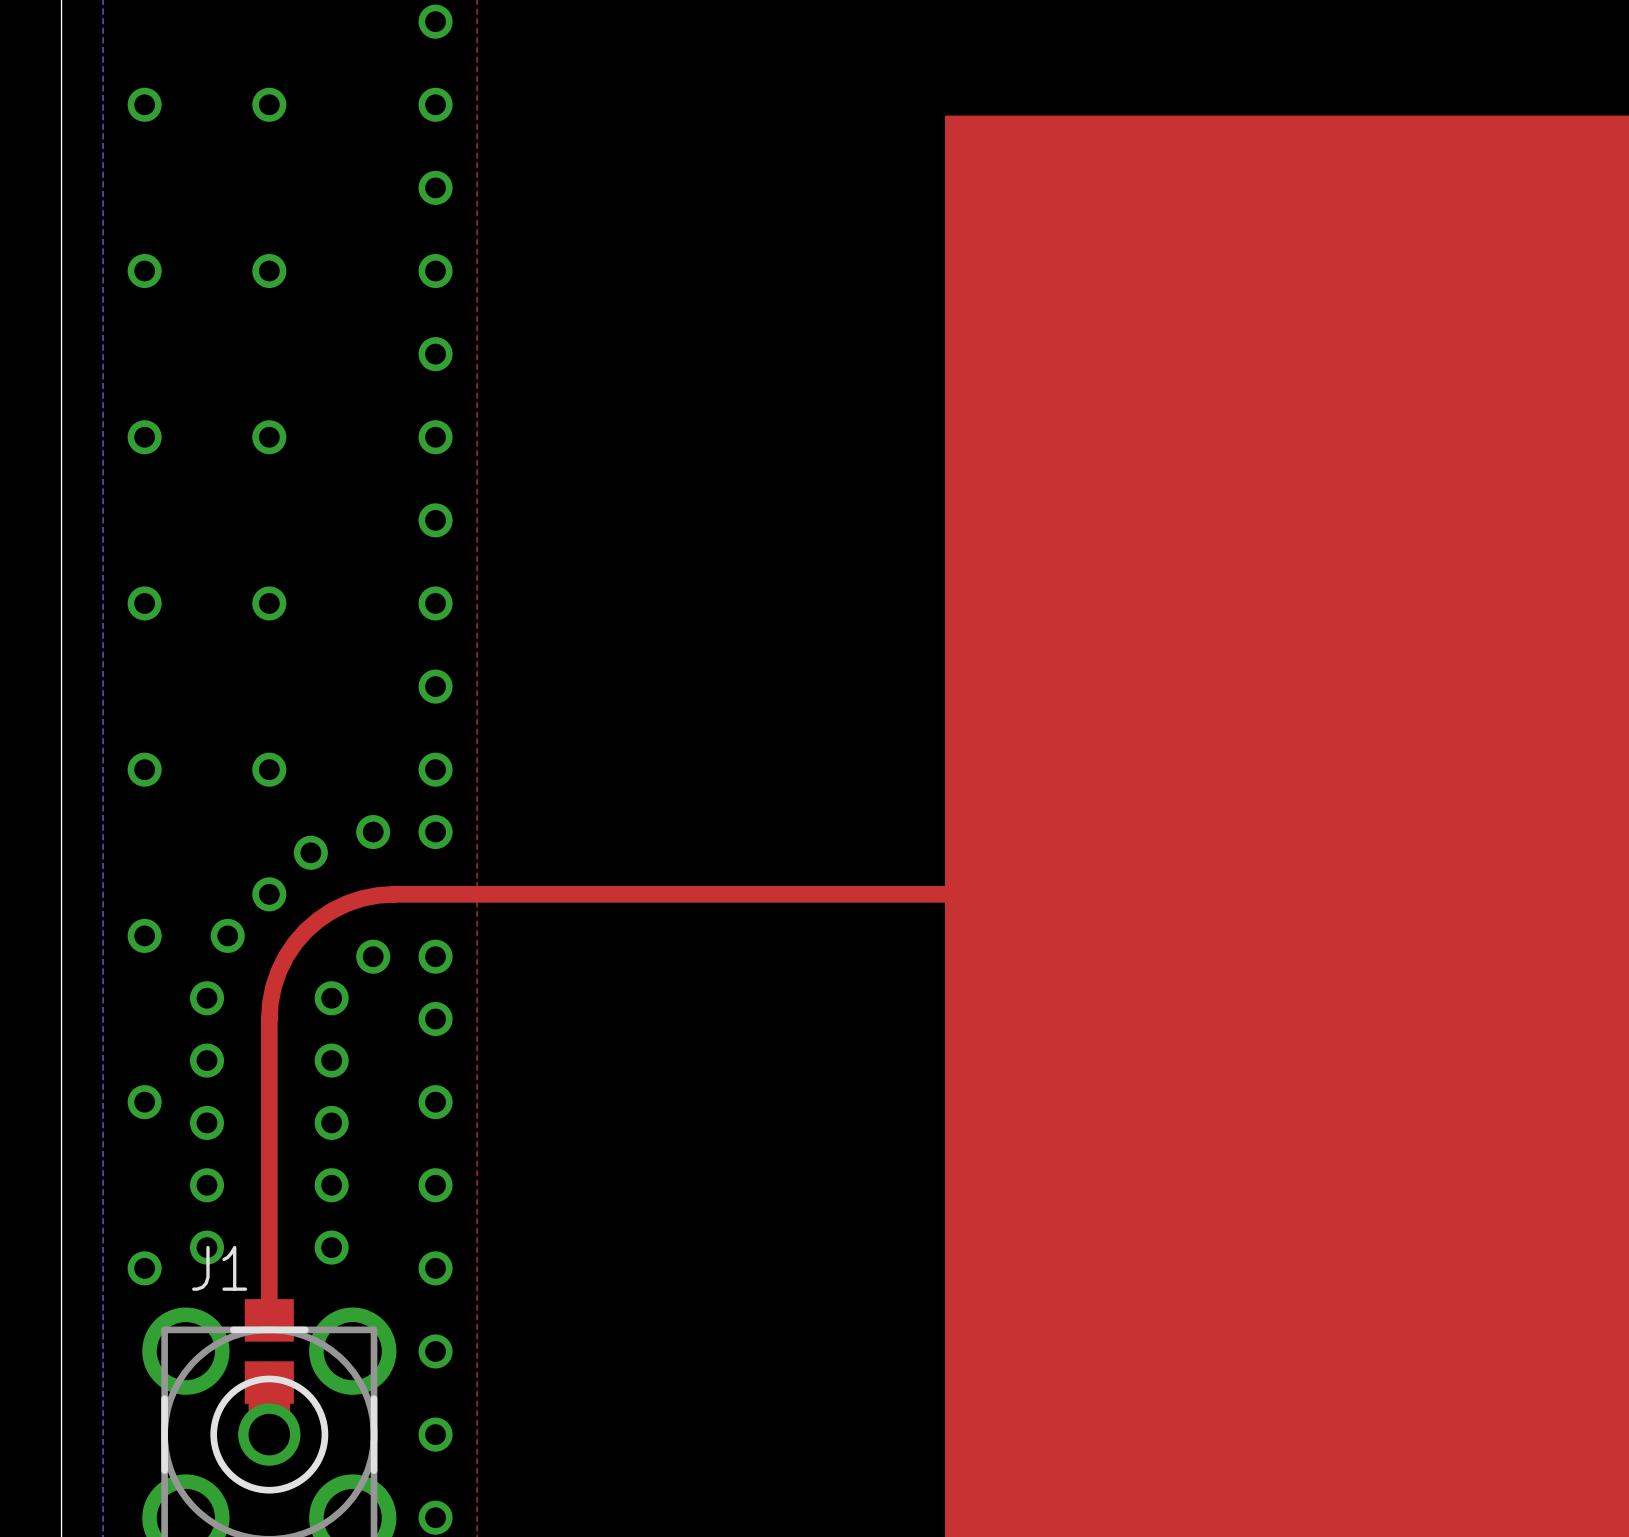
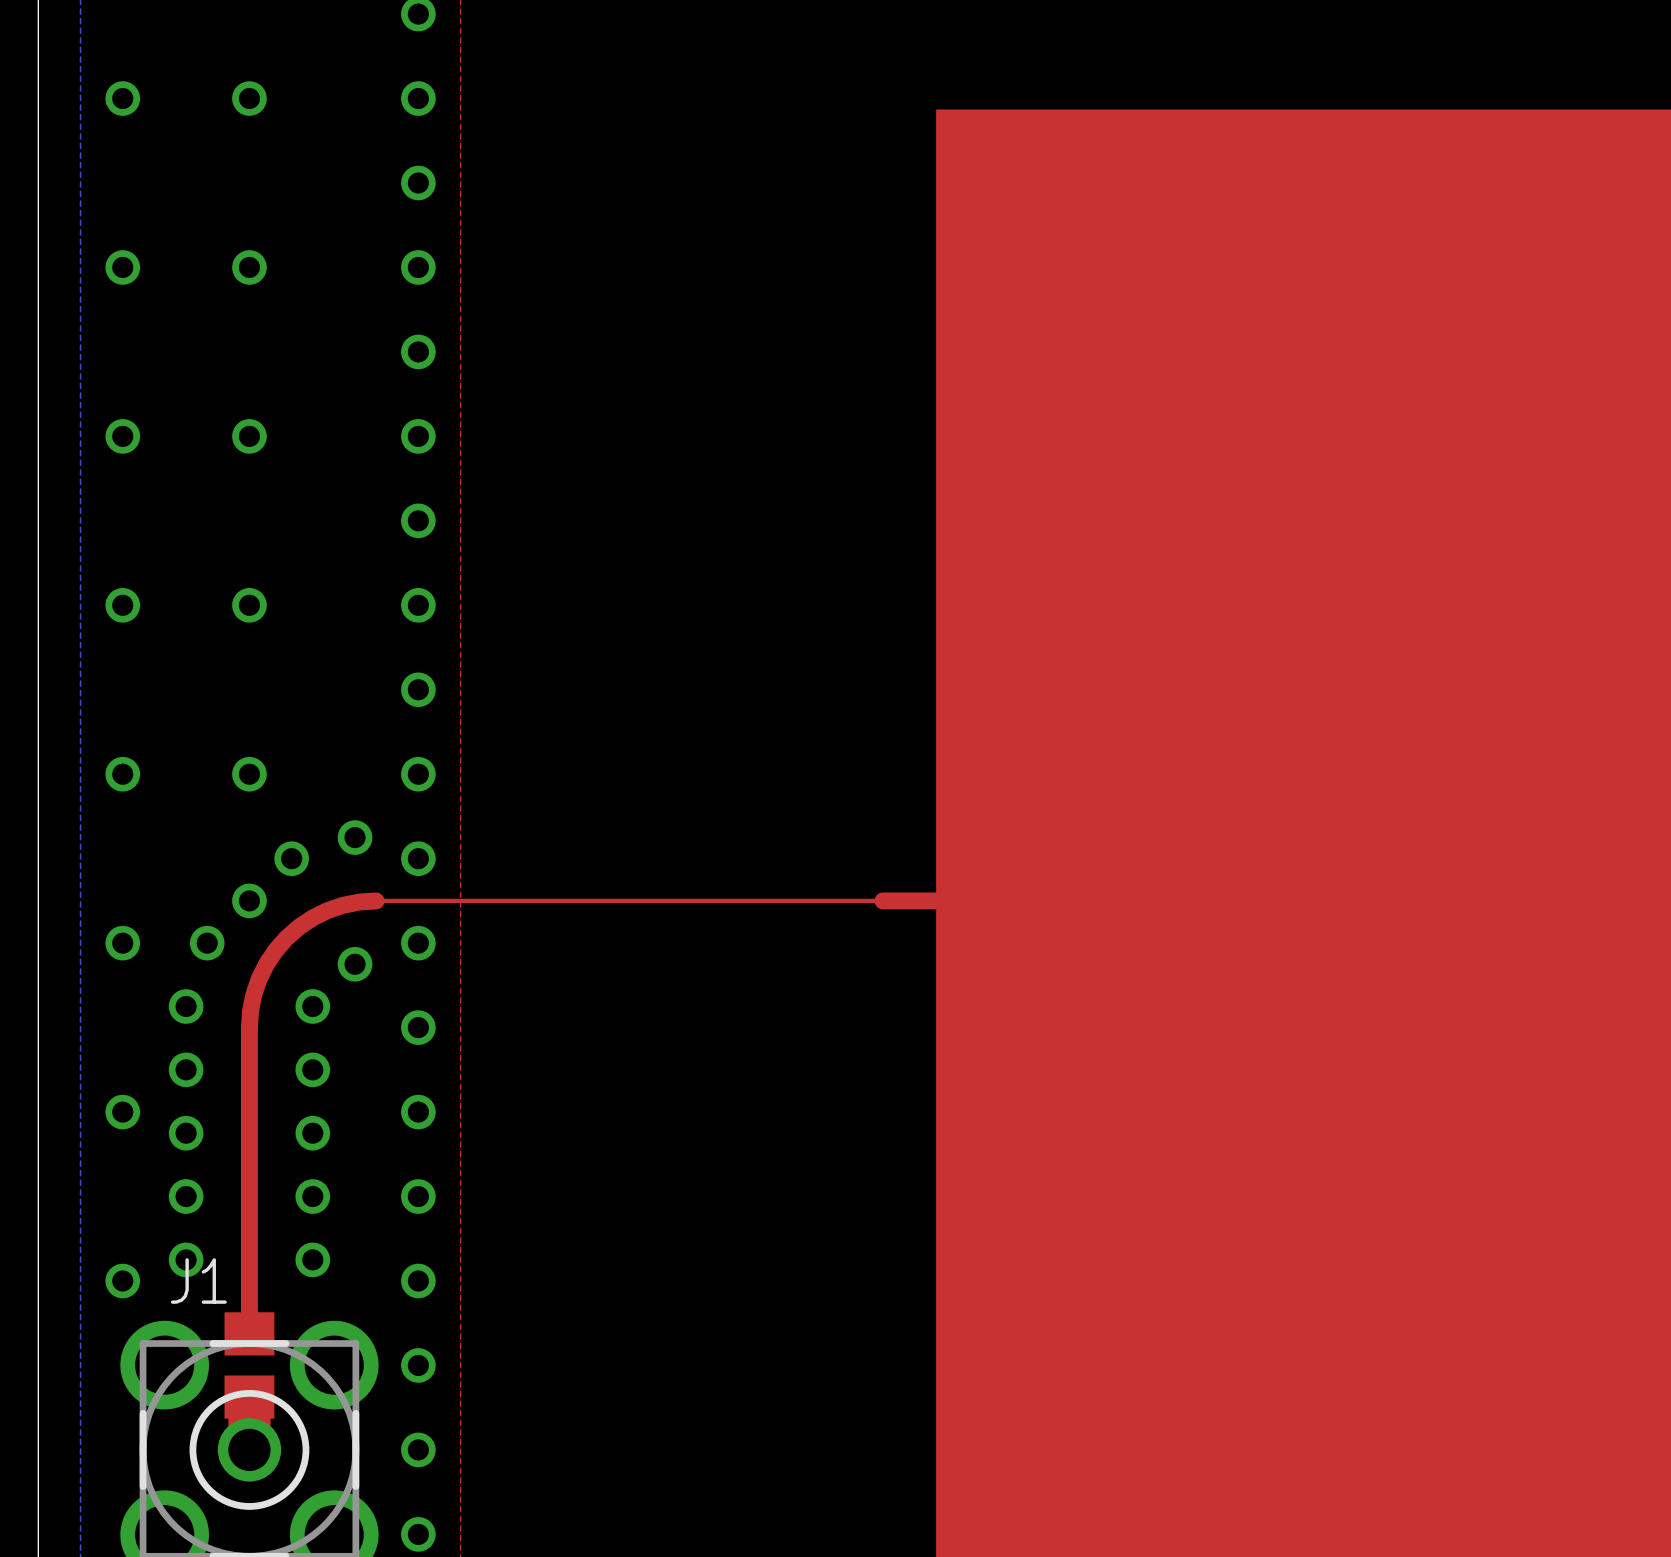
via position: (435, 832) -> (418, 858)
top track width: thick (892, 894) (393, 894) -> thin (882, 900) (376, 900)
via position: (435, 956) -> (418, 943)

